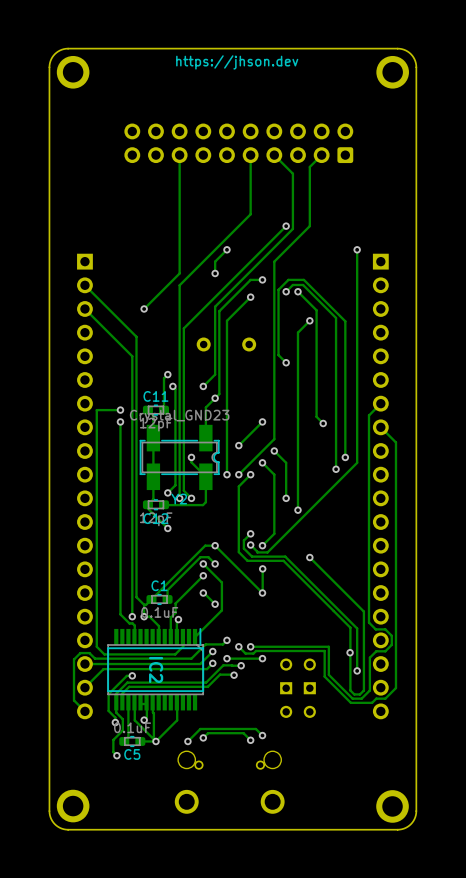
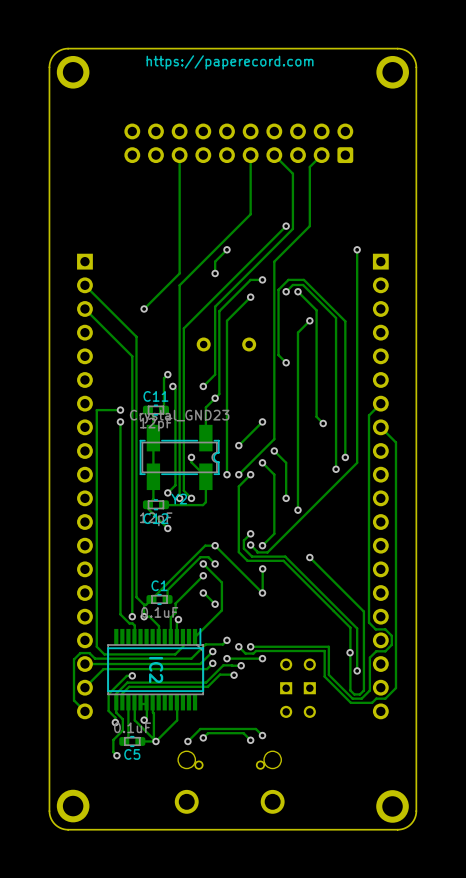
text: none -> https://paperecord.com (230, 62)
text: https://jhson.dev (237, 62) -> none

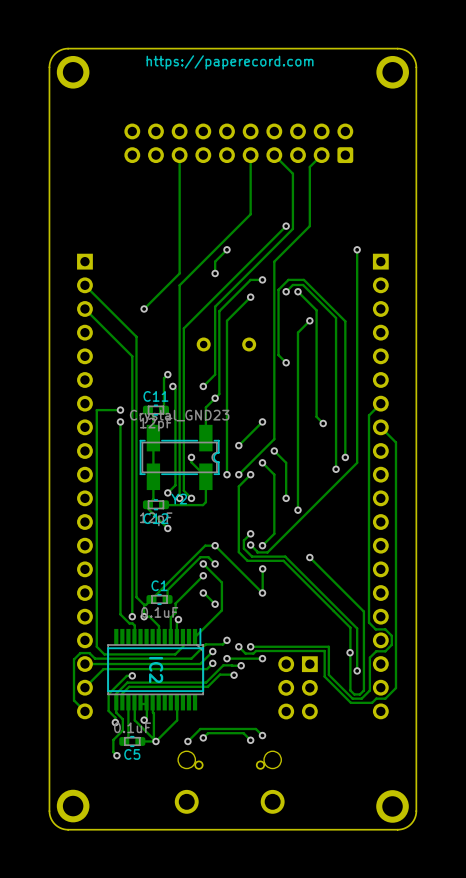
part: none -> (298, 687)
part: (286, 688) -> none
part: (309, 688) -> none

